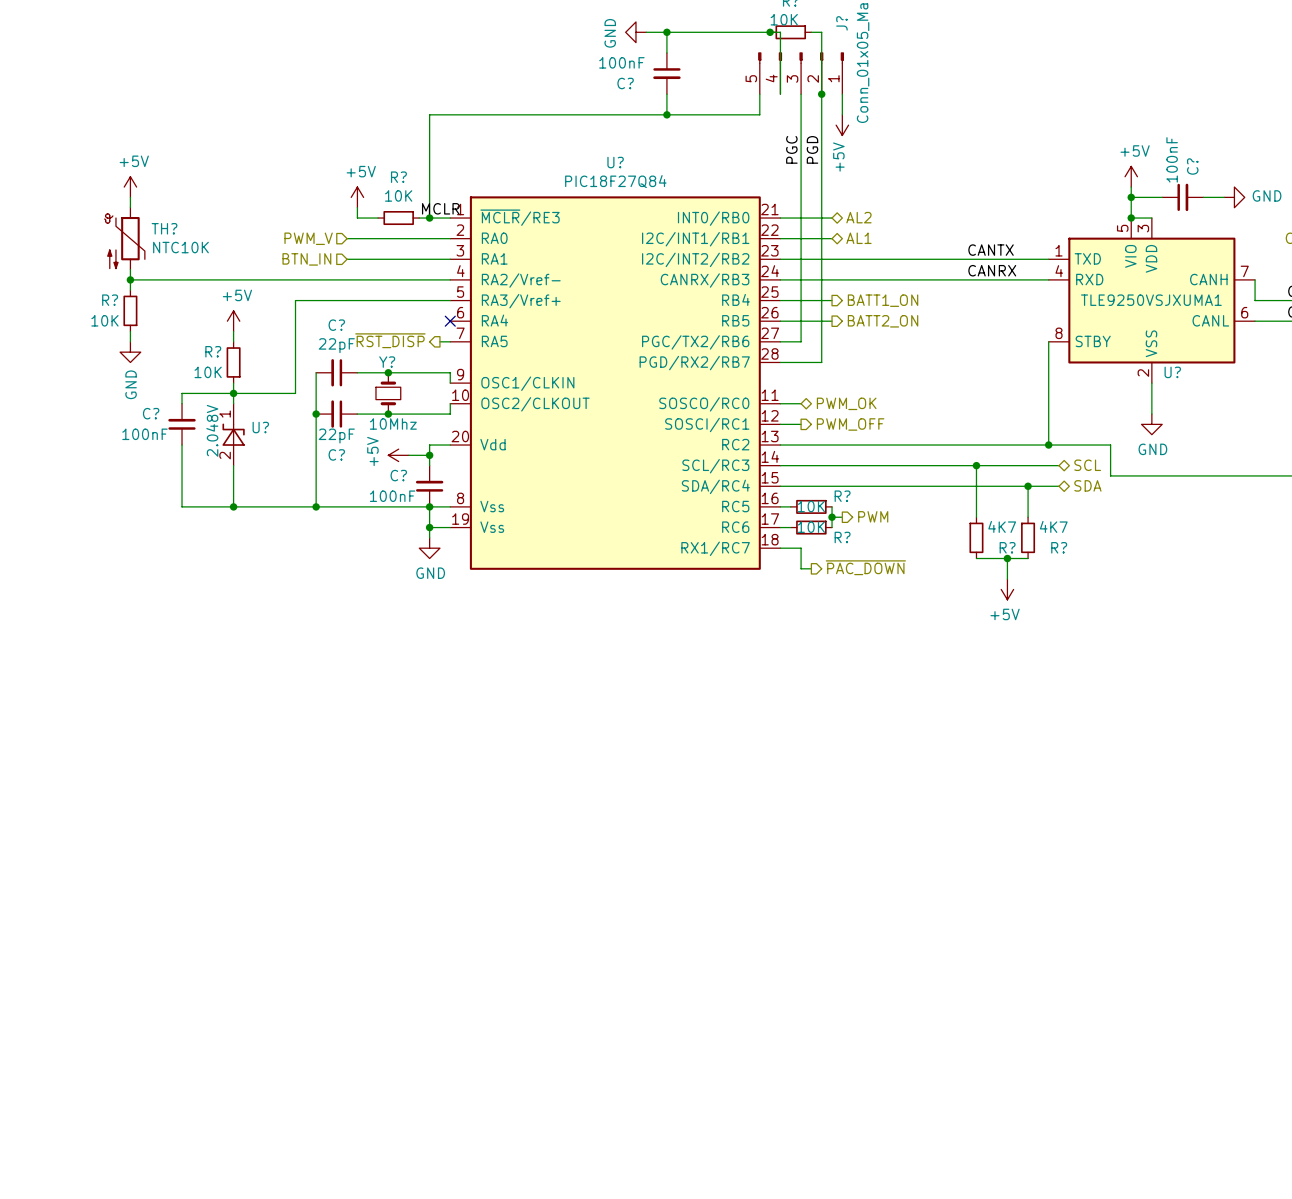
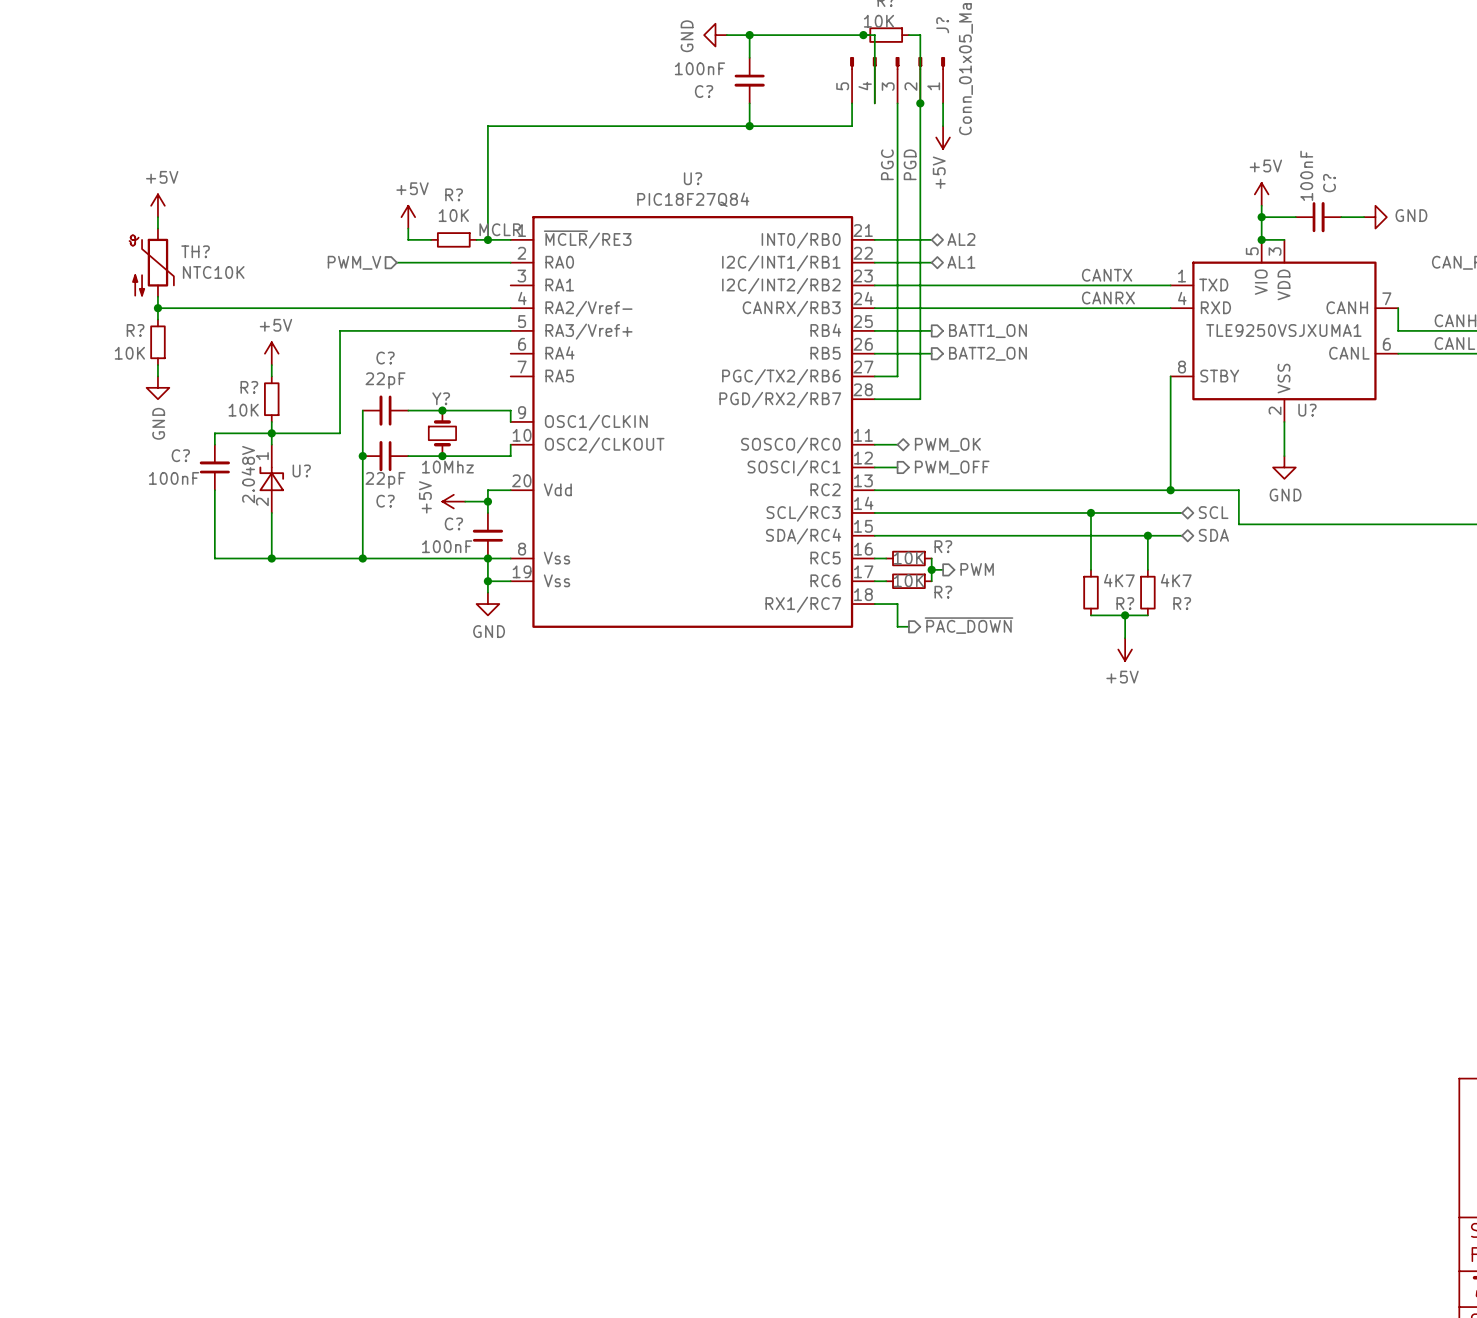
hierarchical label: BTN_IN (306, 259) -> none
wire: (347, 259) (450, 259) -> none
no-connect mark: (450, 321) -> none
hierarchical label: ~{RST_DISP} (390, 340) -> none
wire: (439, 341) (450, 341) -> none

